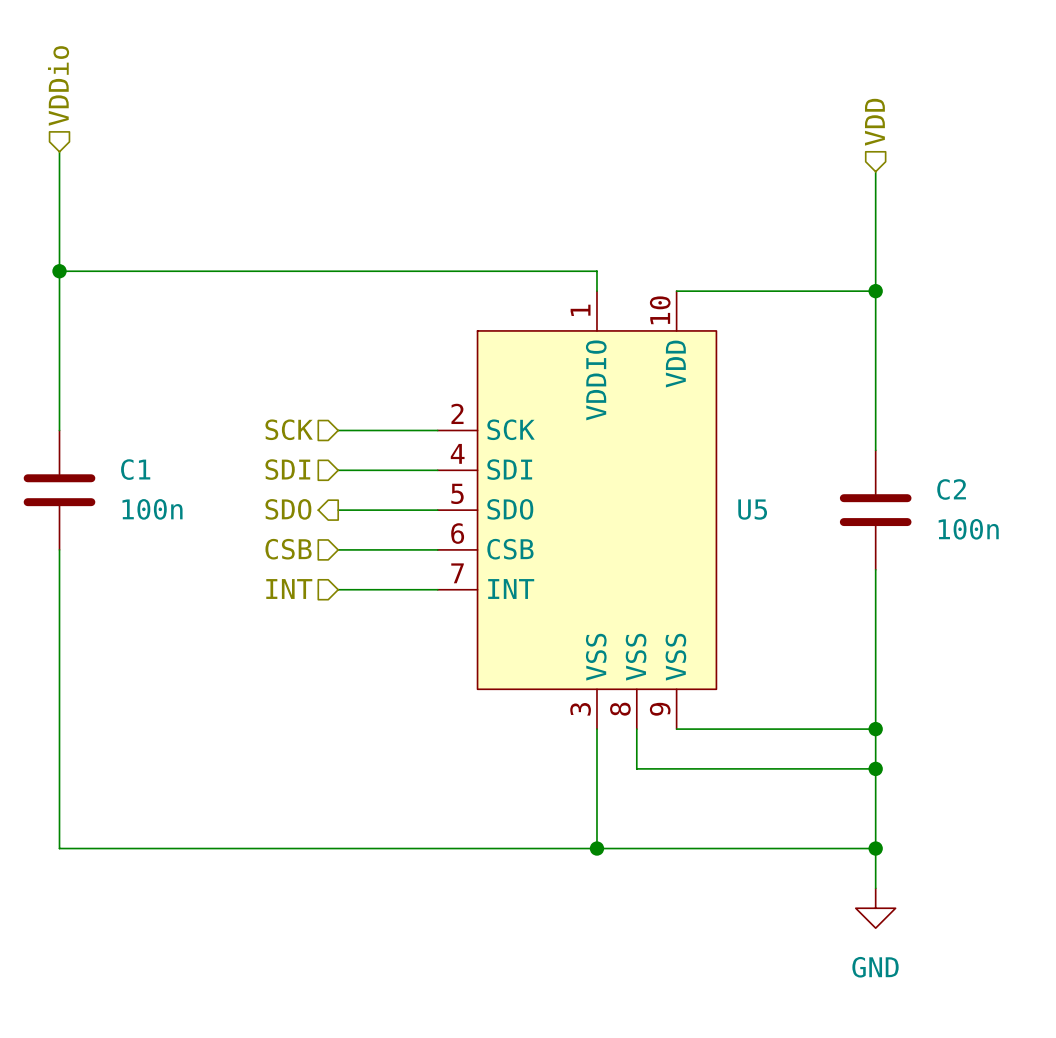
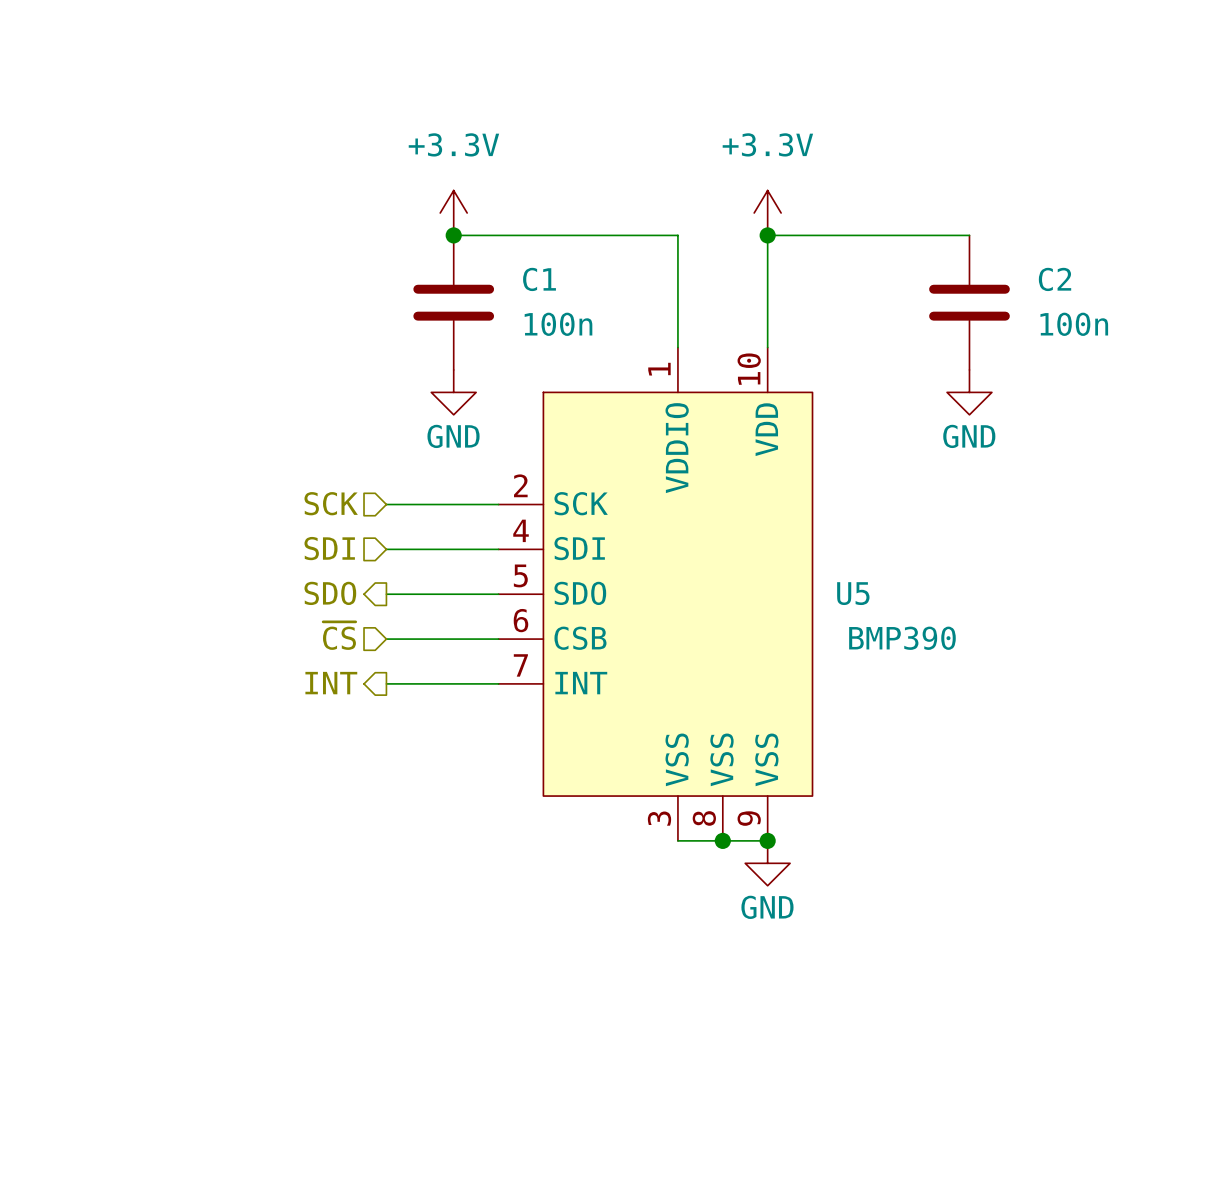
hierarchical label: VDDio (58, 85) -> none
hierarchical label: VDD (874, 122) -> none
wire: (59, 151) (59, 430) -> none
power symbol: none -> +3.3V (453, 212)
power symbol: none -> +3.3V (767, 212)
wire: (875, 171) (875, 450) -> none
junction: none -> (453, 235)
junction: none -> (767, 235)
wire: (59, 271) (596, 271) -> (453, 235) (677, 235) (677, 325)
junction: (59, 271) -> none
wire: (676, 291) (875, 291) -> (767, 347) (767, 235) (969, 235)
junction: (875, 291) -> none
power symbol: none -> GND (453, 392)
power symbol: none -> GND (969, 392)
C1 position: (59, 490) -> (453, 302)
C2 position: (875, 510) -> (969, 302)
wire: (59, 549) (59, 848) (875, 848) -> none
hierarchical label: CSB (288, 549) -> ~{CS} (339, 635)
U5 value: none -> BMP390 (902, 638)
wire: (875, 569) (875, 888) -> none
hierarchical label shape: input (289, 589) -> output (331, 683)
wire: (596, 729) (596, 848) -> (677, 840) (767, 840)
wire: (636, 729) (636, 768) (875, 768) -> none
junction: none -> (722, 840)
wire: (676, 729) (875, 729) -> none
junction: none -> (767, 840)
junction: (875, 729) -> none
junction: (875, 768) -> none
junction: (596, 848) -> none
junction: (875, 848) -> none
power symbol position: GND (875, 908) -> GND (767, 863)
power symbol text position: GND (875, 967) -> GND (767, 907)

